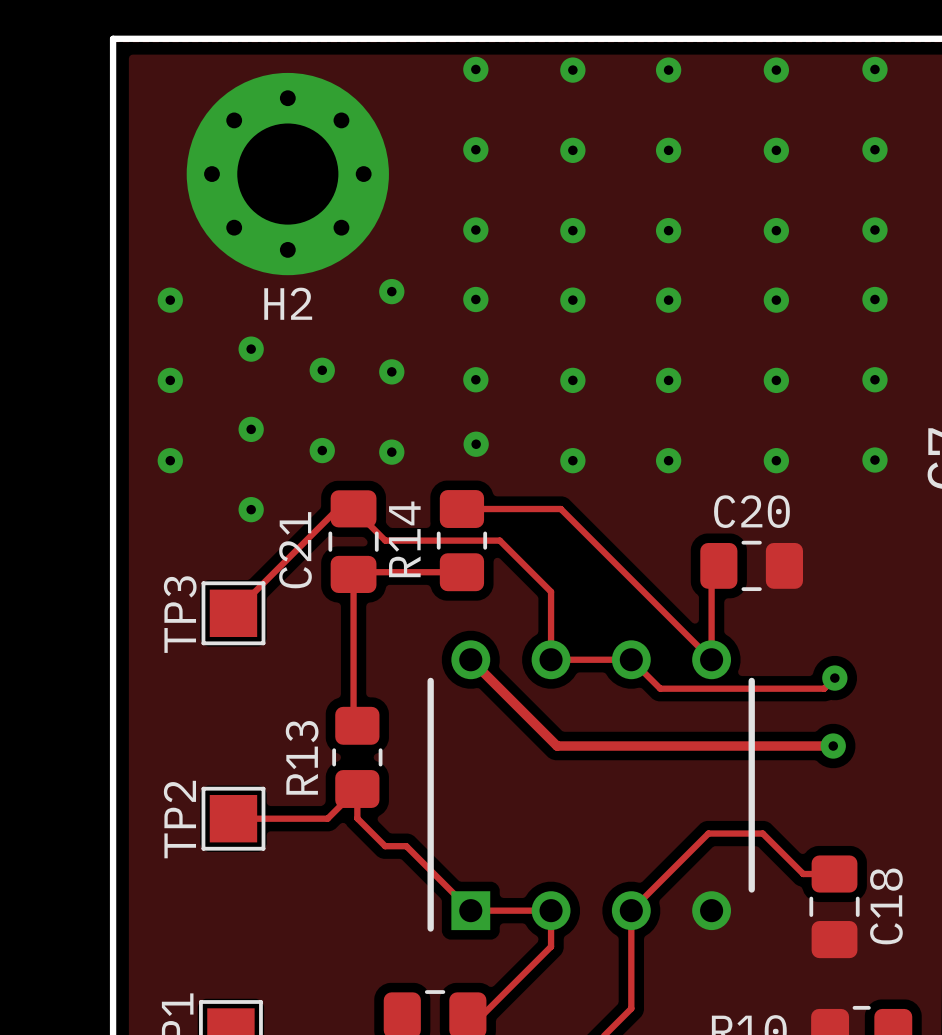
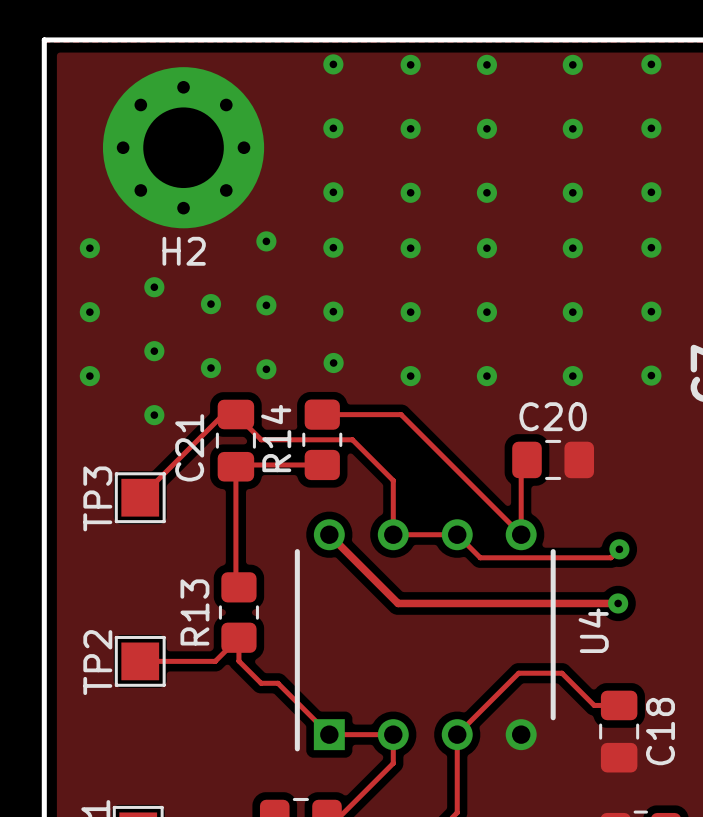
text: none -> U4 (593, 630)

